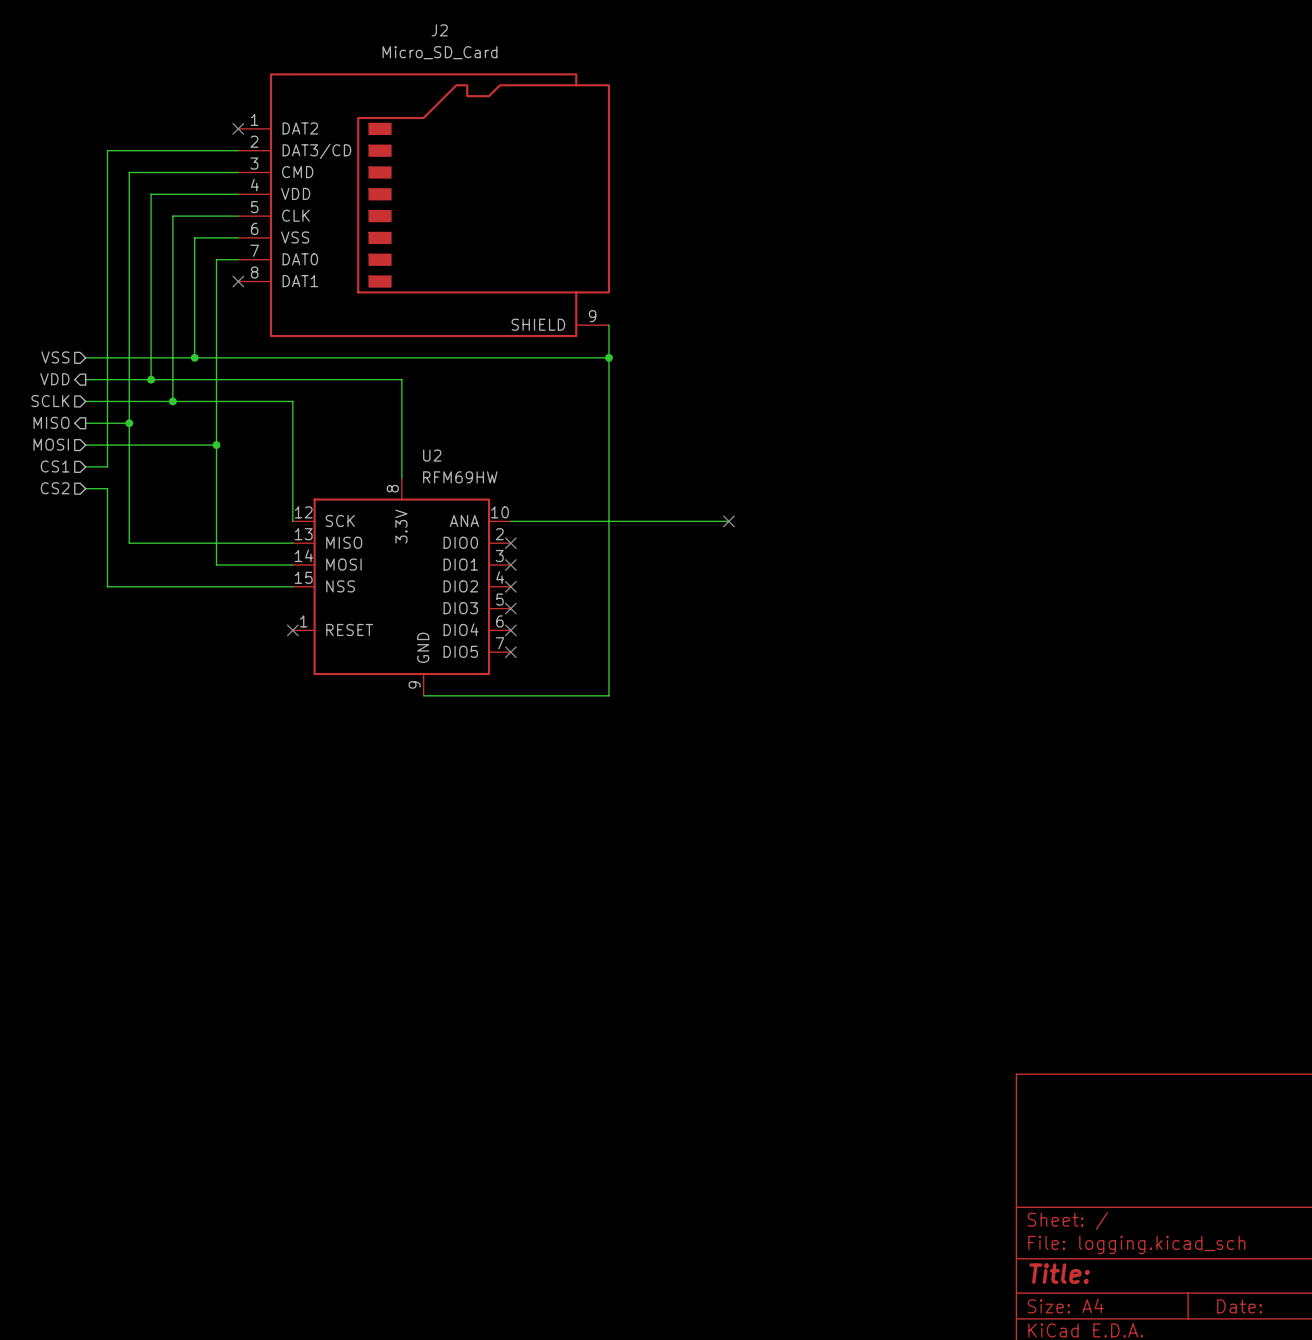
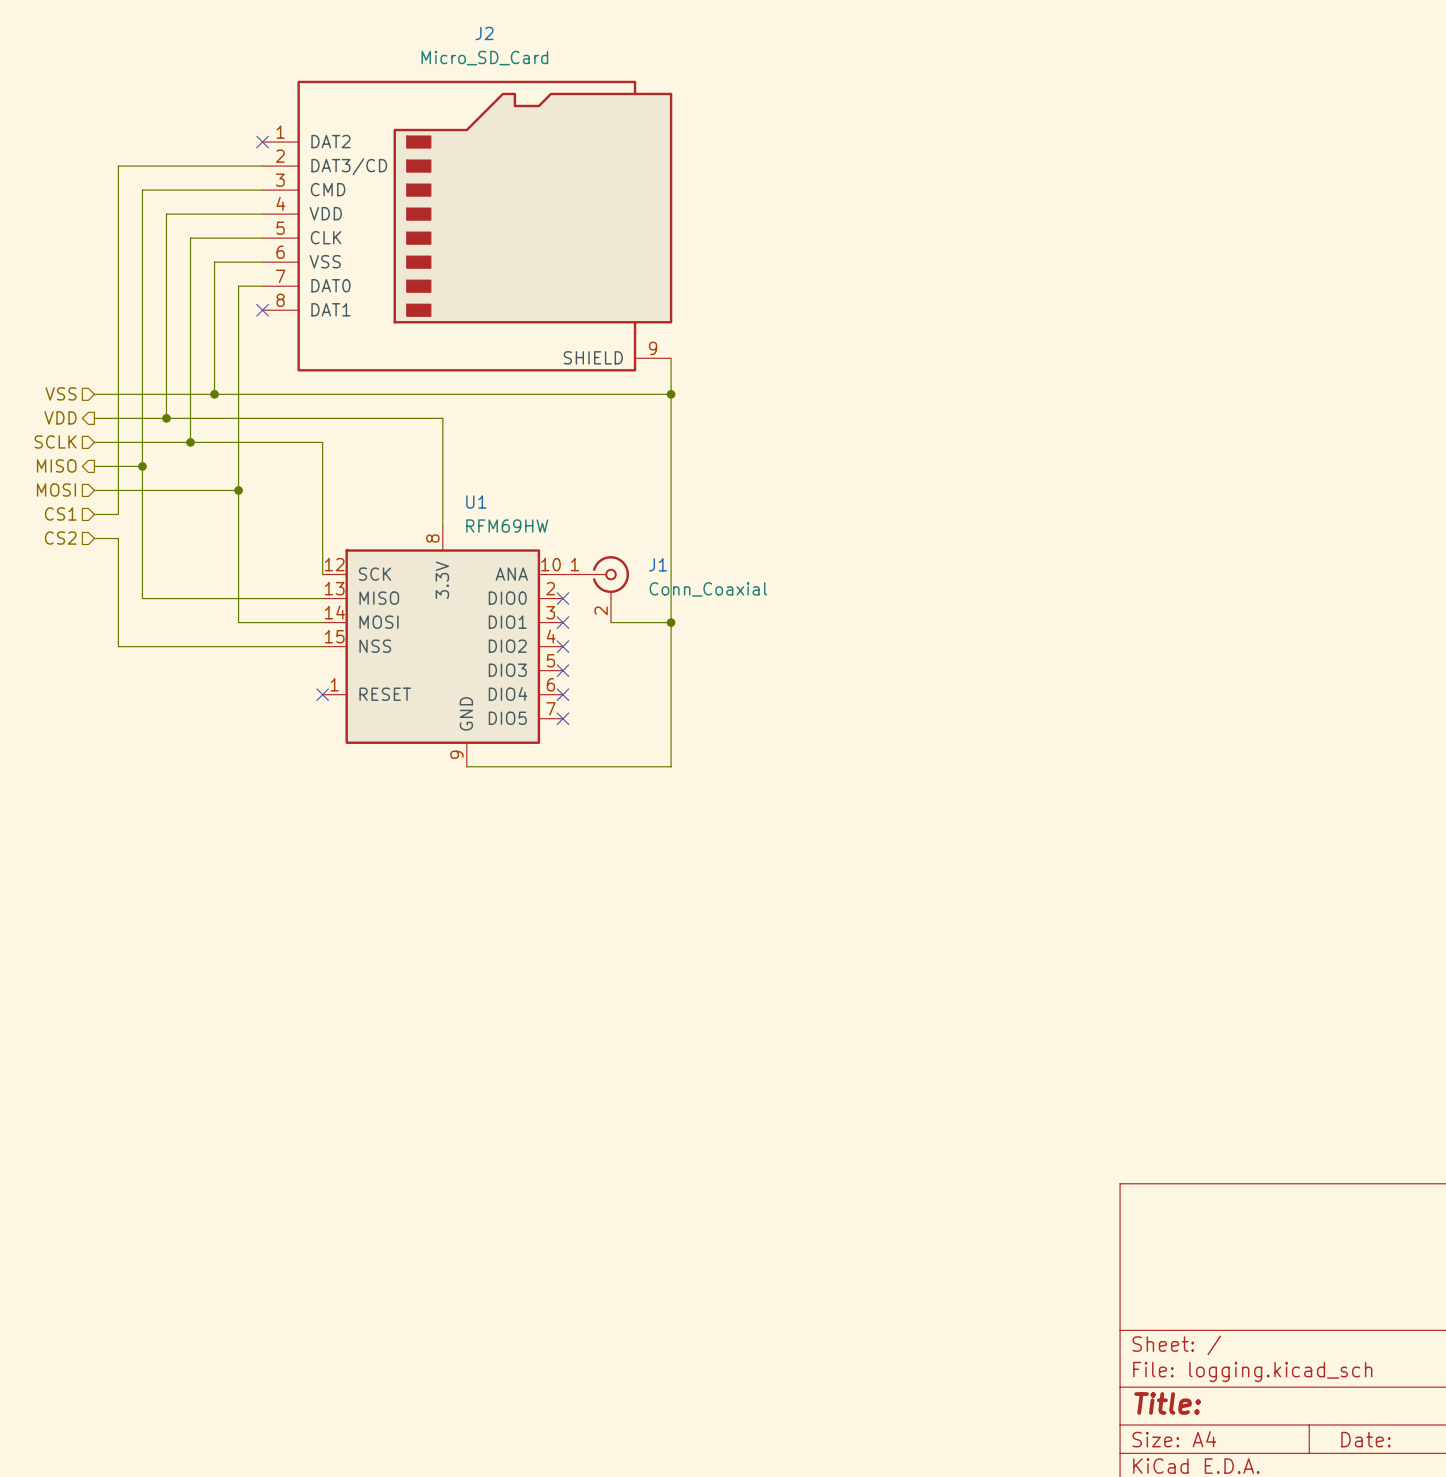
U2 name: U2 (432, 455) -> U1 (476, 502)
wire: (510, 521) (728, 521) -> none
no-connect mark: (728, 521) -> none
J1: none -> Conn_Coaxial (595, 589)
wire: none -> (611, 622) (671, 622)
junction: none -> (671, 622)

